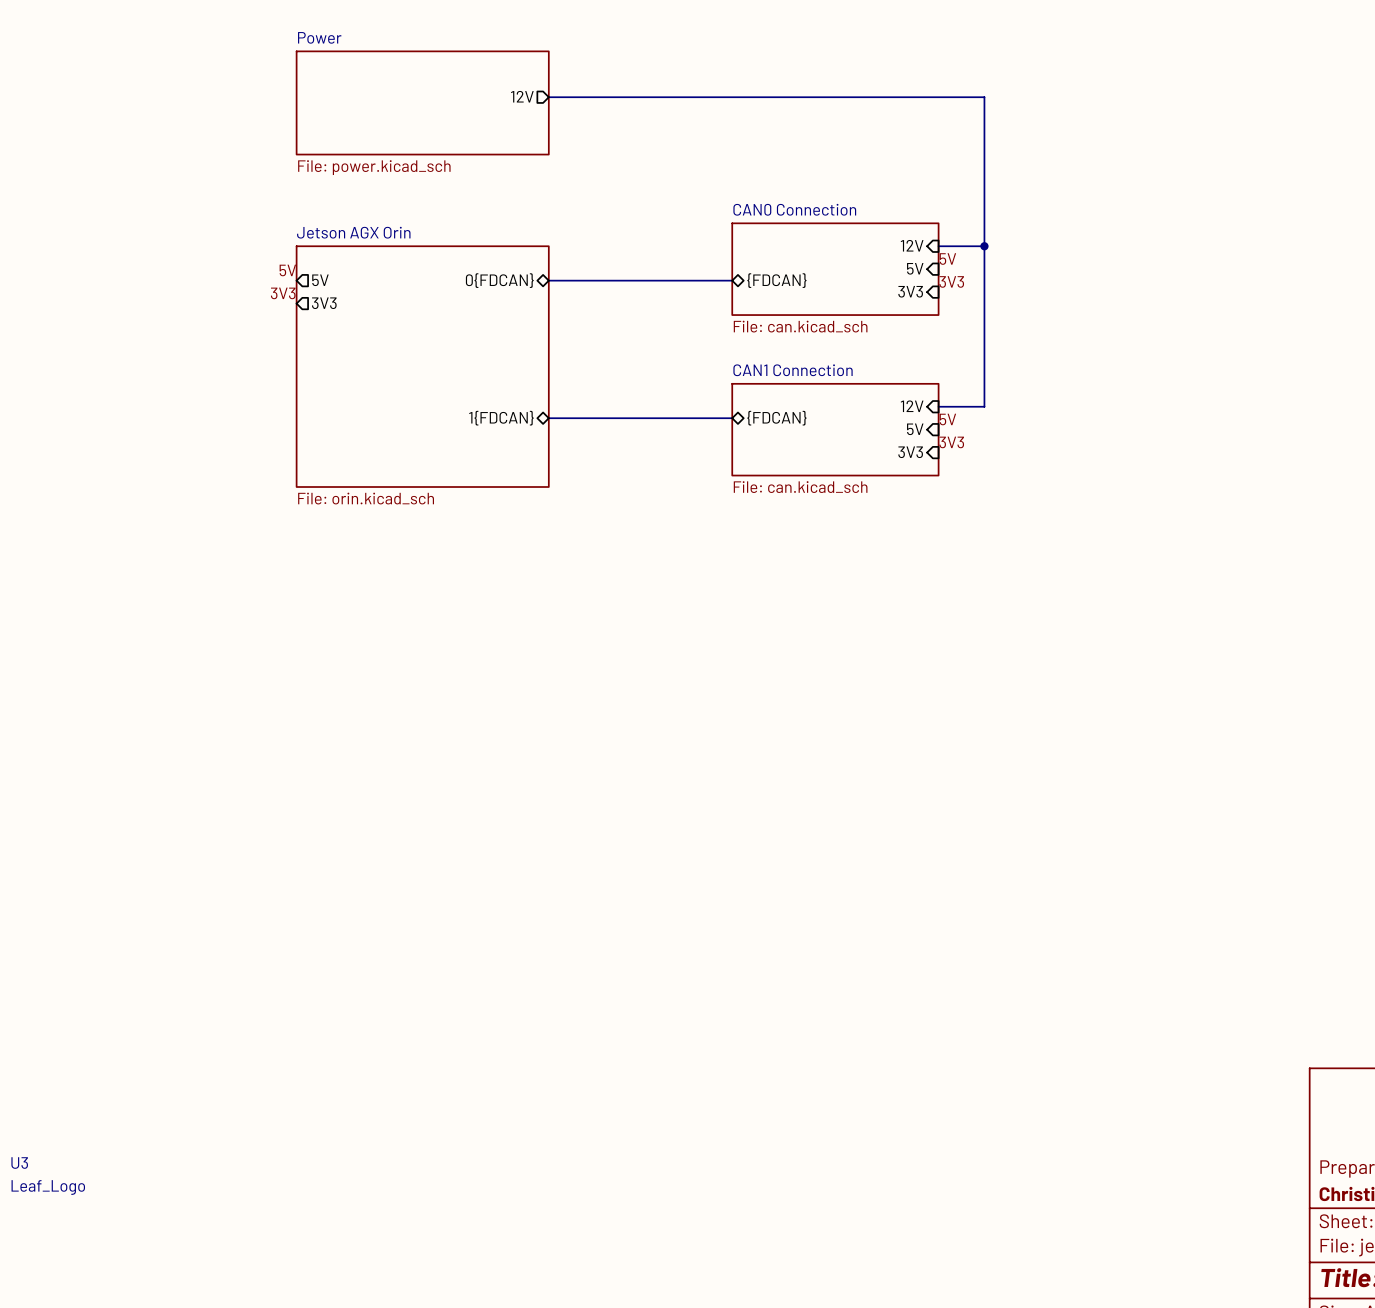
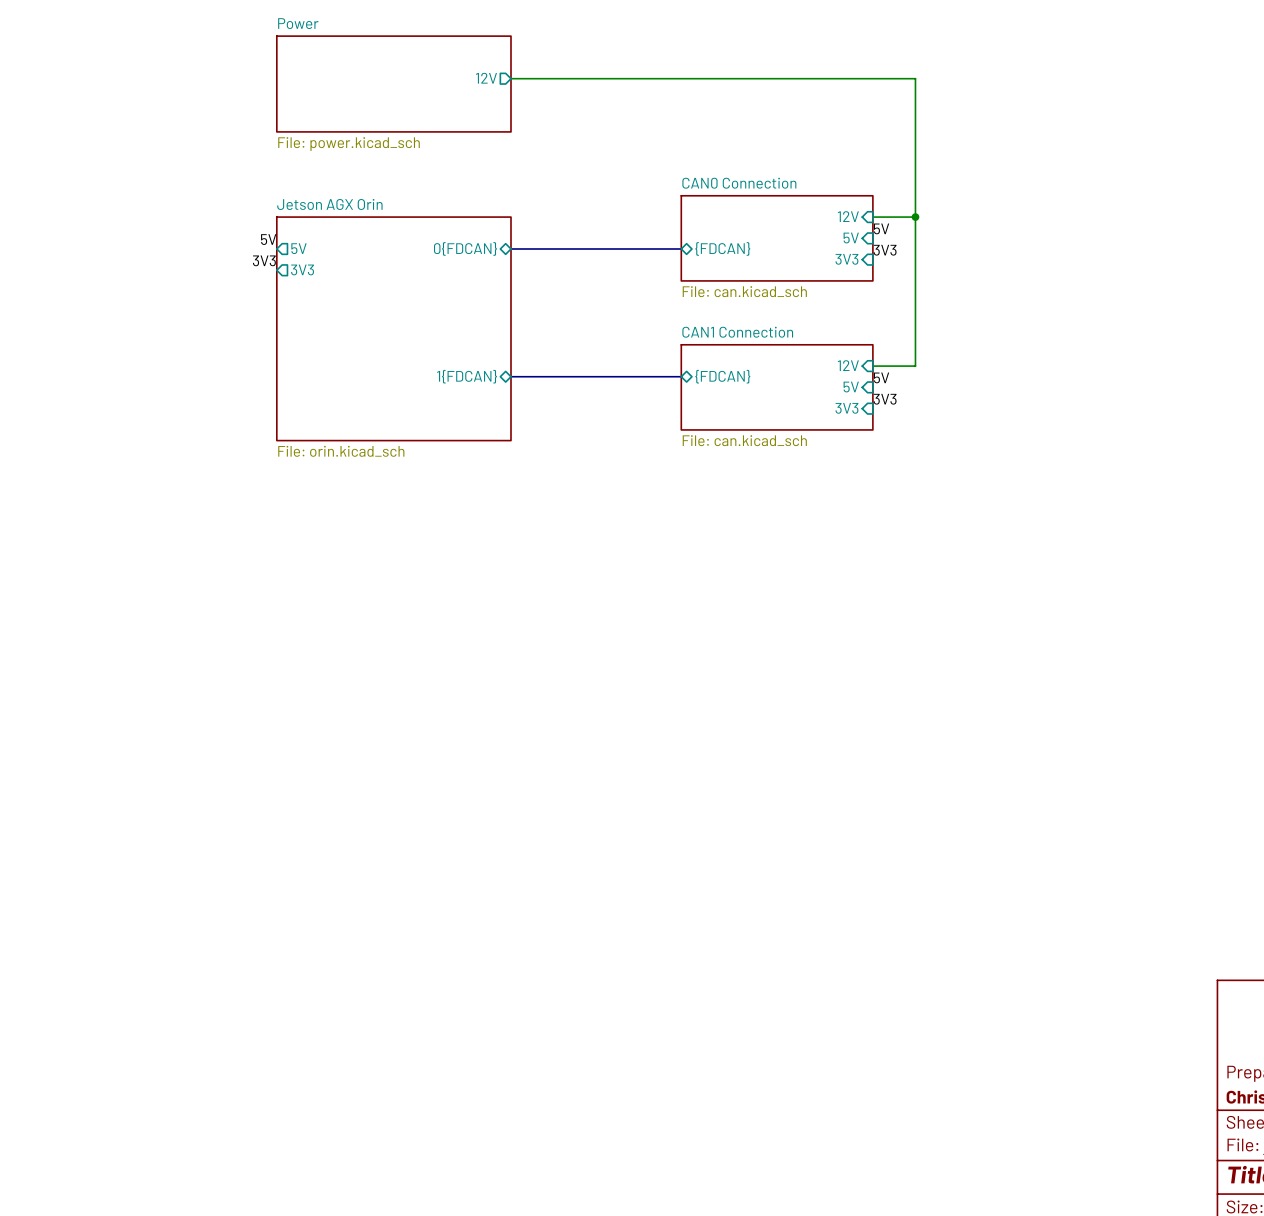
U3: Leaf_Logo (48, 1176) -> none

